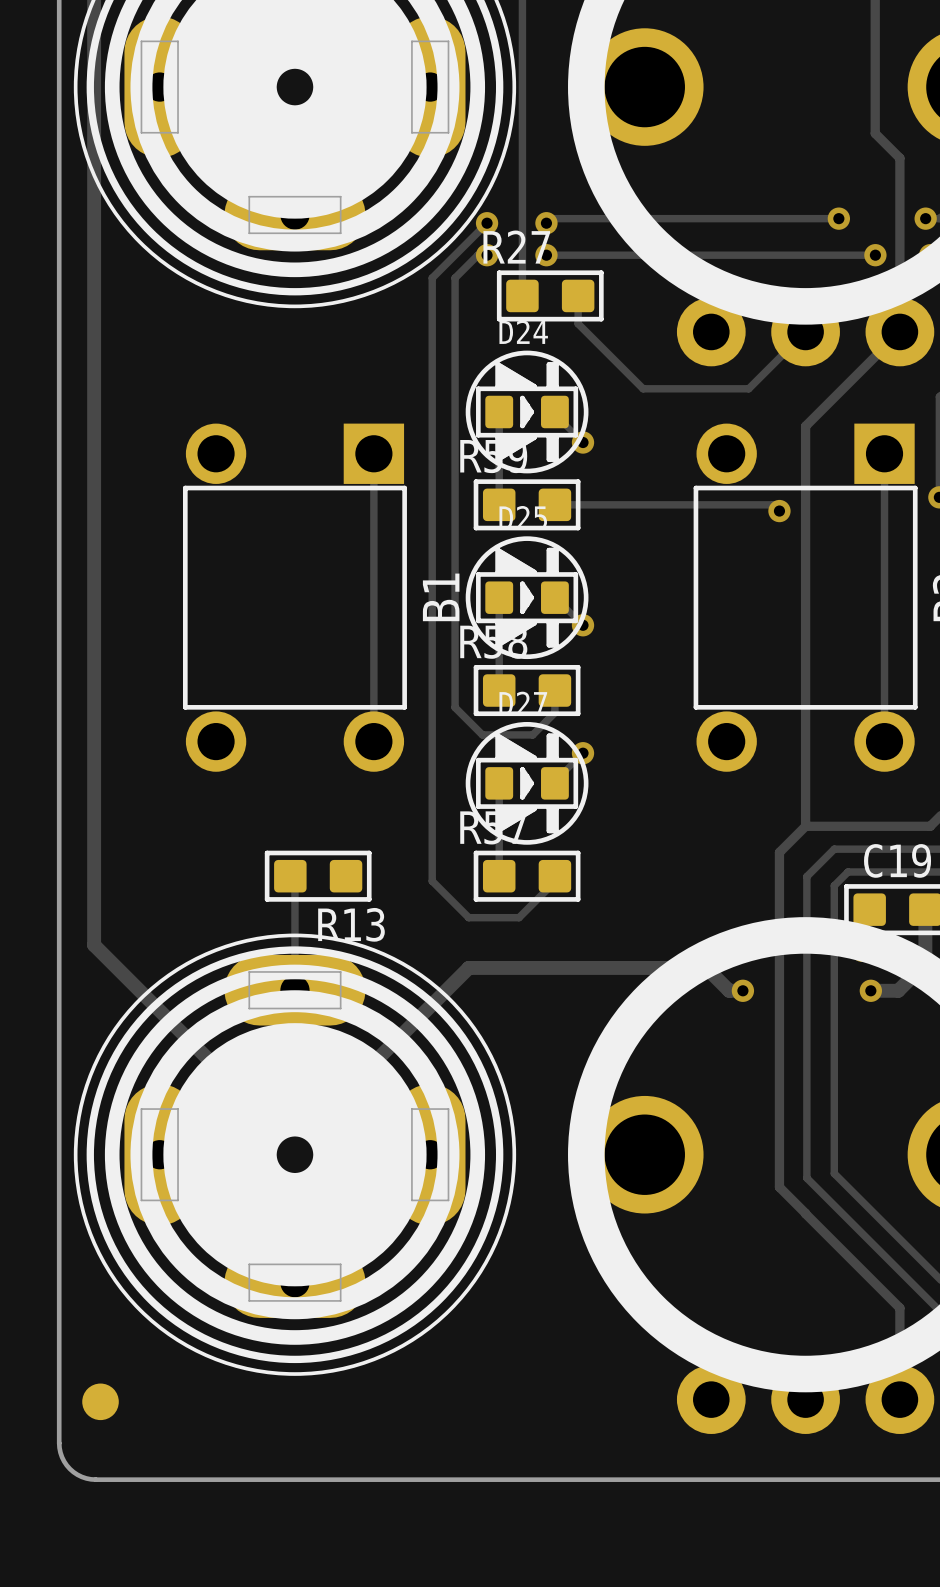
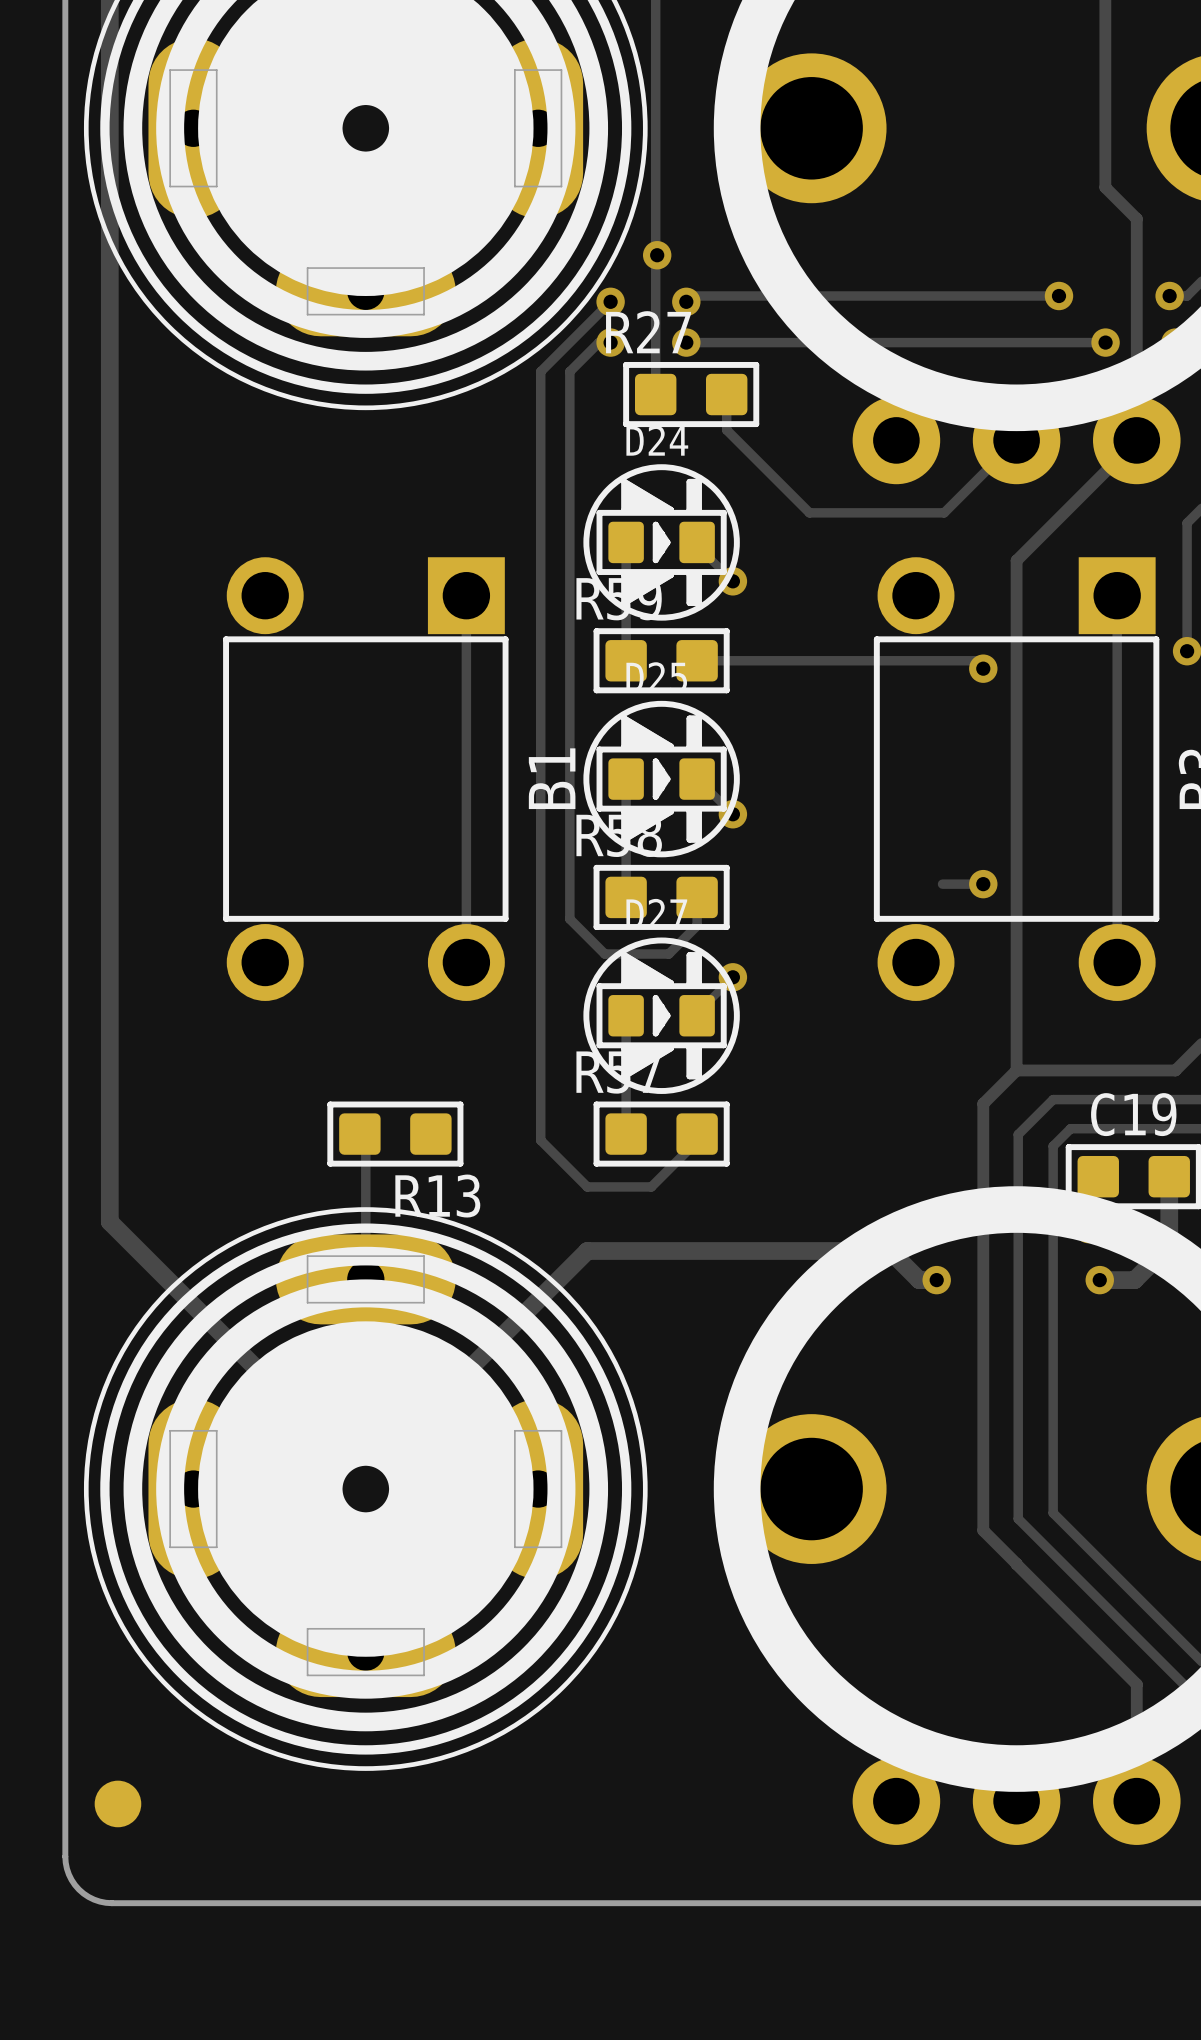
via: none -> (657, 255)
track: none -> (942, 884) (983, 884)
via: none -> (983, 884)

